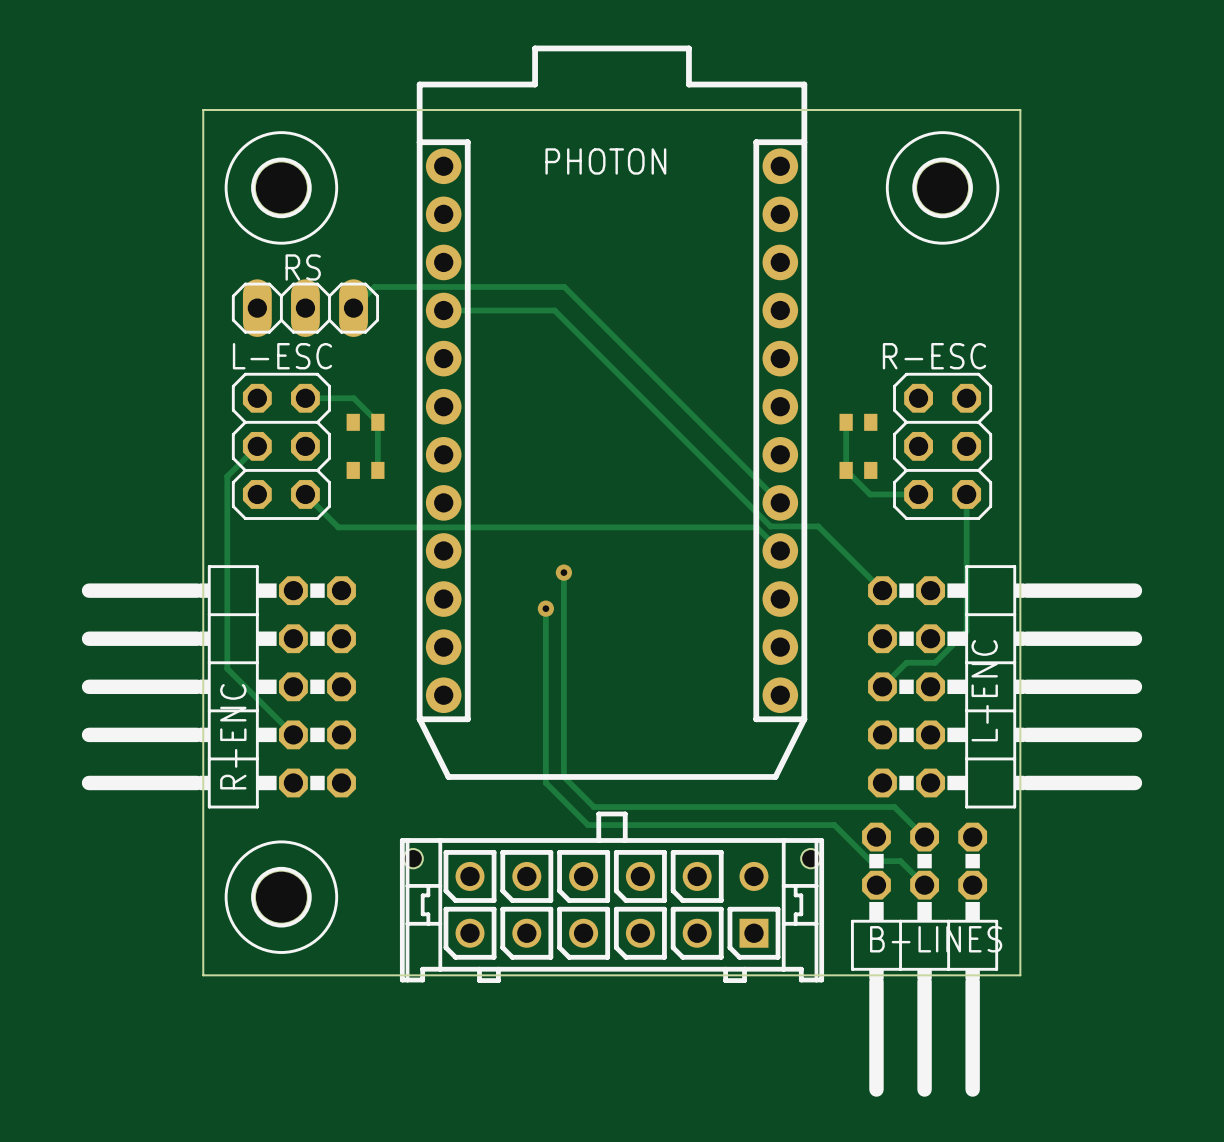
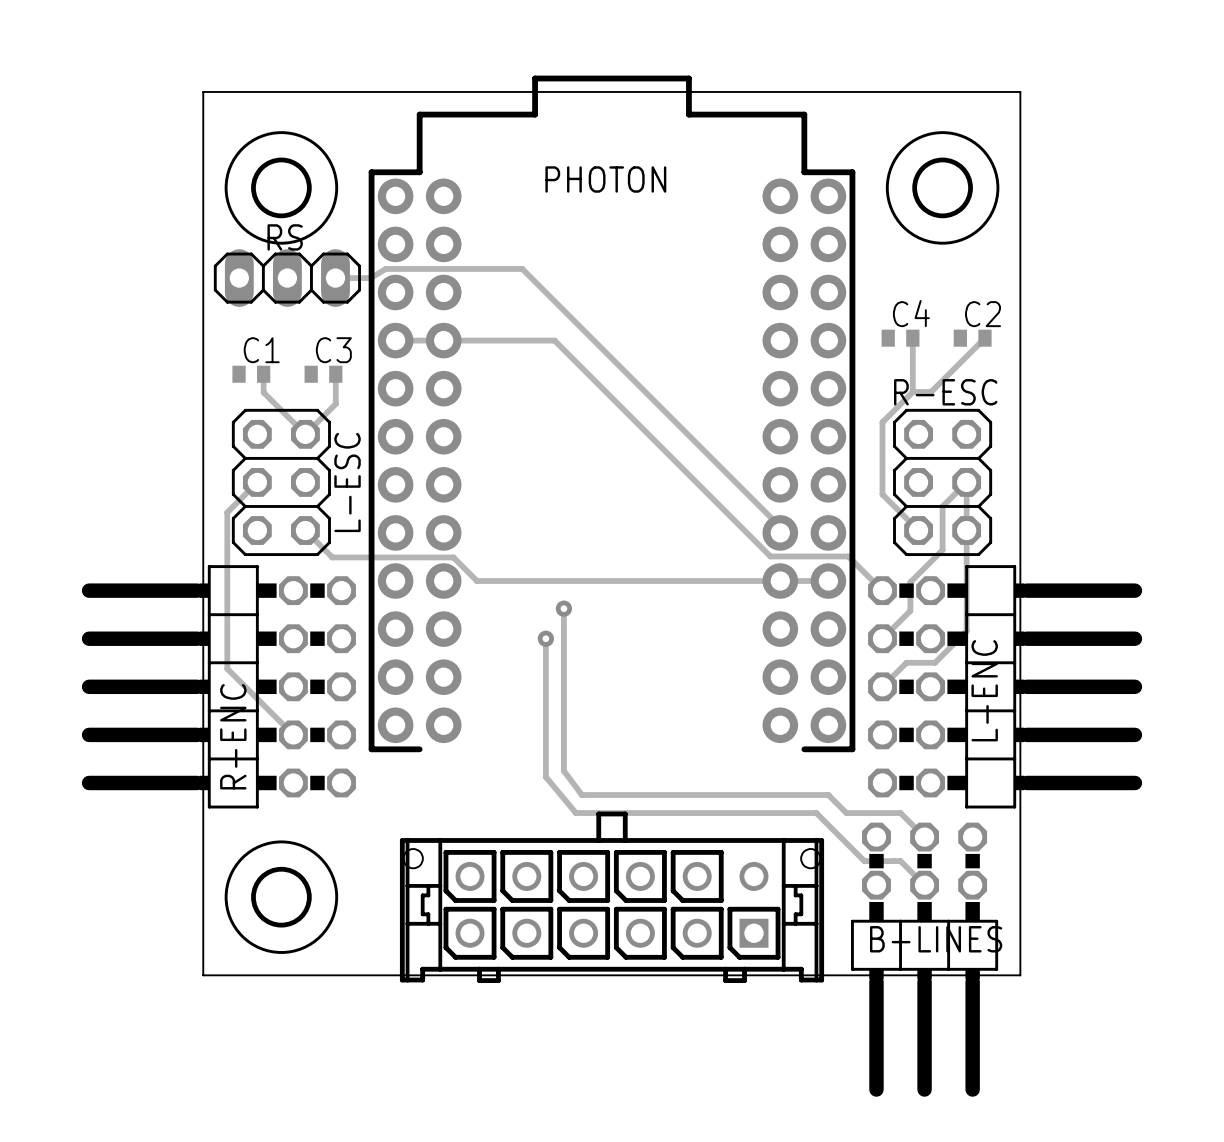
PHOTON footprint: [416, 45, 808, 780] -> [368, 75, 856, 753]
board edge: (203, 110) (1020, 110) -> (203, 110) (203, 91) (1020, 91) (1020, 110)
track: none -> (335, 278) (370, 278) (385, 268) (522, 268) (786, 532)
RS position: (305, 308) -> (287, 278)
track: (353, 308) (374, 286) (564, 286) (780, 502) -> none
track: (443, 310) (554, 310) (770, 526) (818, 526) (848, 556) -> (395, 340) (554, 340) (770, 556) (848, 556)
C4: none -> (900, 338)
track: none -> (912, 338) (912, 391)
C2: none -> (972, 338)
track: none -> (984, 338) (931, 391) (912, 391)
L-ESC name rotation: 0° (282, 356) -> 90° counterclockwise (347, 482)
R-ESC name position: R-ESC (934, 356) -> R-ESC (945, 392)
C1: none -> (251, 374)
track: none -> (263, 374) (263, 392) (305, 434) (335, 404) (335, 374)
C3: none -> (323, 374)
track: none -> (912, 391) (882, 422) (882, 494) (918, 530)
track: (305, 398) (353, 398) (377, 422) (377, 470) -> none
part: (365, 422) -> none
track: (846, 422) (846, 470) (870, 494) (918, 494) -> none
part: (858, 422) -> none
track: (257, 446) (227, 476) (227, 512) -> (257, 482) (227, 512)
L-ESC position: (281, 446) -> (281, 482)
R-ESC position: (942, 446) -> (942, 482)
part: (365, 470) -> none
part: (858, 470) -> none
track: none -> (966, 482) (942, 506) (942, 550) (910, 582) (910, 610) (882, 638)
track: (305, 494) (338, 527) (756, 527) (780, 550) -> none
track: none -> (305, 530) (332, 557) (453, 557) (477, 581) (828, 581)
track: (563, 572) (563, 608) -> none
via: (563, 572) -> none
track: (545, 608) (545, 638) -> none
via: (545, 608) -> none
via: none -> (563, 608)
via: none -> (545, 638)
track: (563, 770) (563, 776) (593, 807) (894, 807) (900, 813) -> (563, 770) (581, 795) (828, 795) (846, 813) (900, 813)
track: (545, 776) (545, 782) (587, 825) (834, 825) (870, 861) -> (545, 776) (575, 813) (816, 813) (864, 861) (870, 861)

